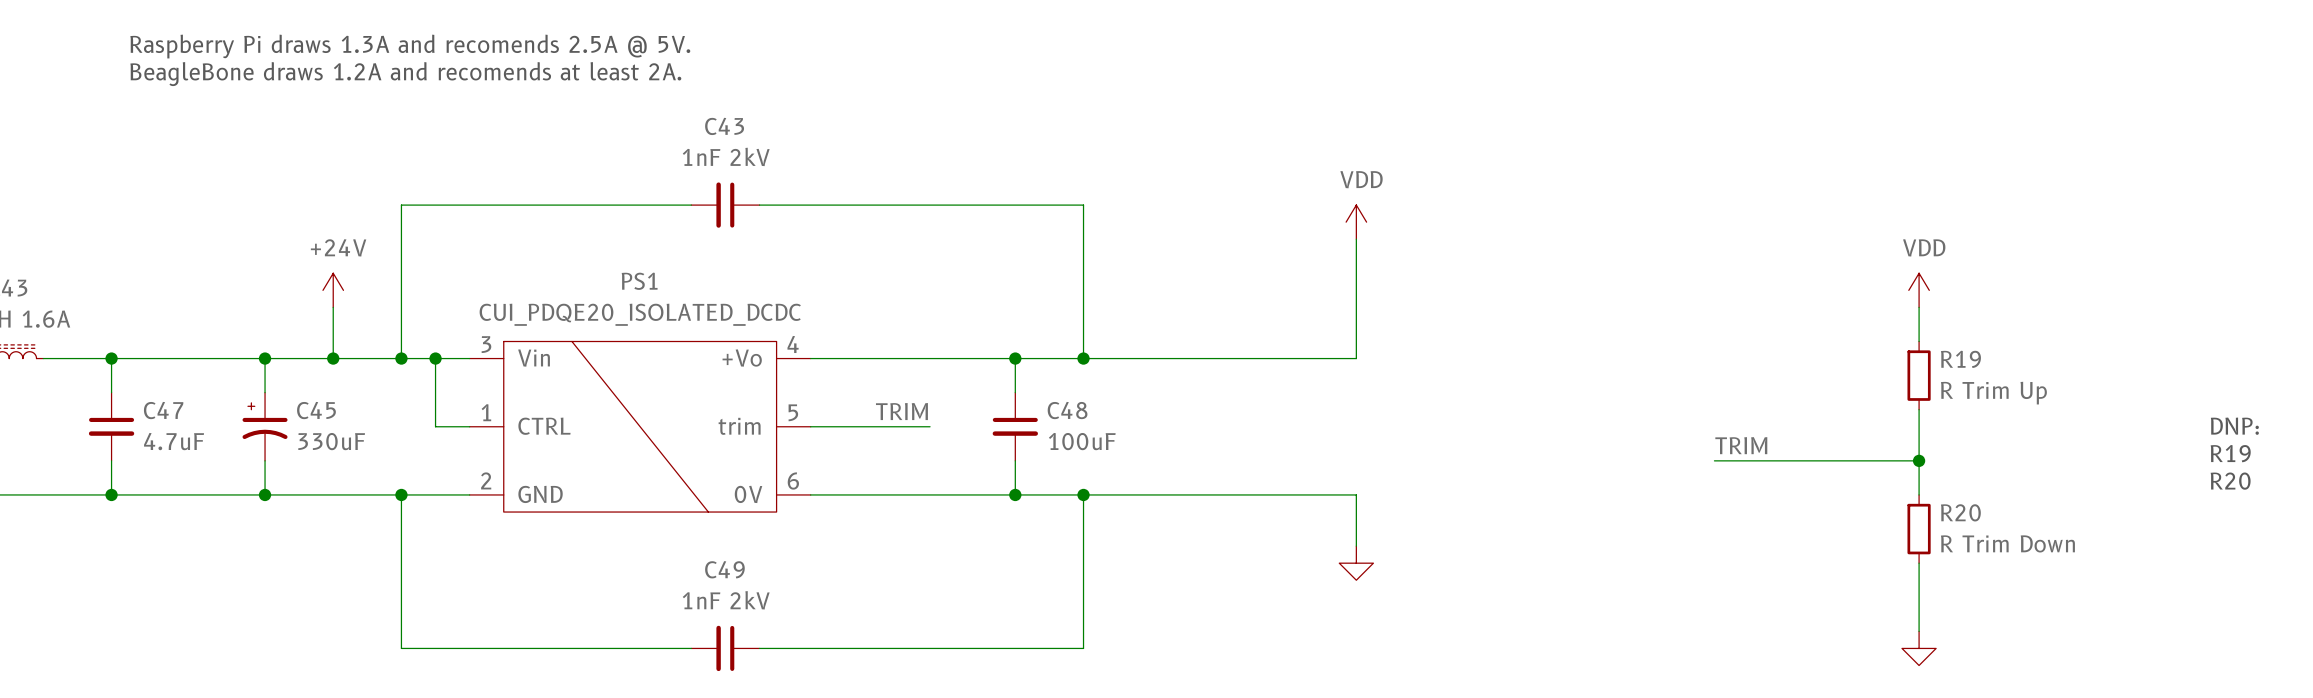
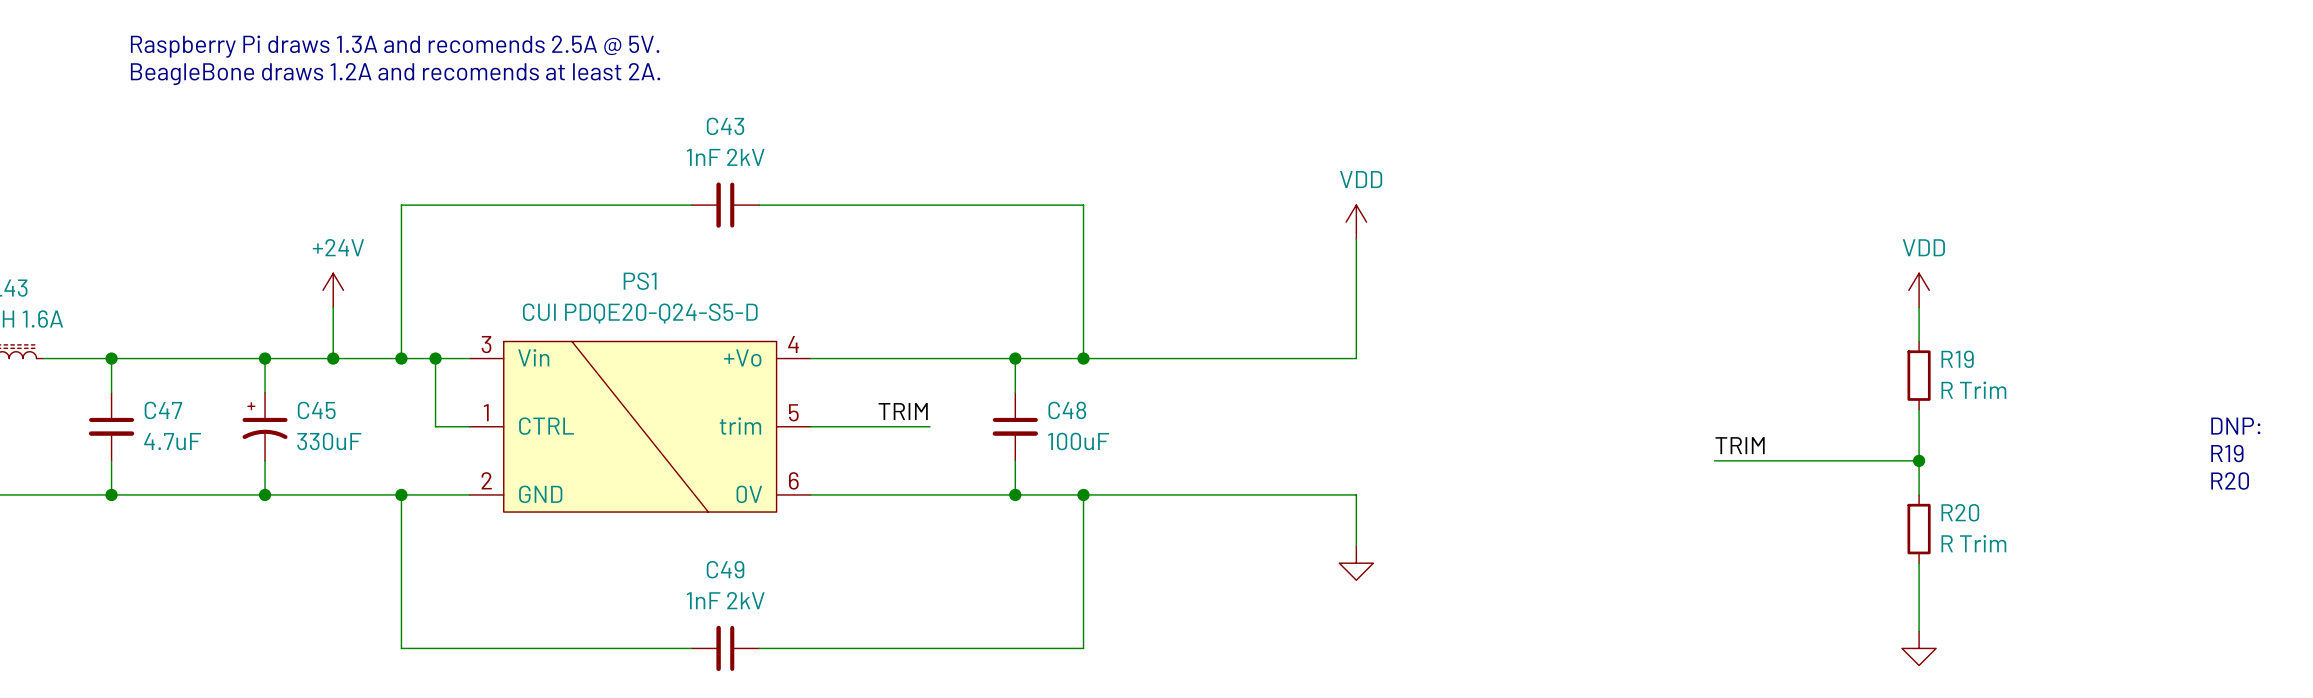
PS1 value: CUI_PDQE20_ISOLATED_DCDC (640, 314) -> CUI PDQE20-Q24-S5-D (640, 313)
R19 value: R Trim Up (1993, 393) -> R Trim (1973, 390)
R20 value: R Trim Down (2007, 543) -> R Trim (1973, 543)

